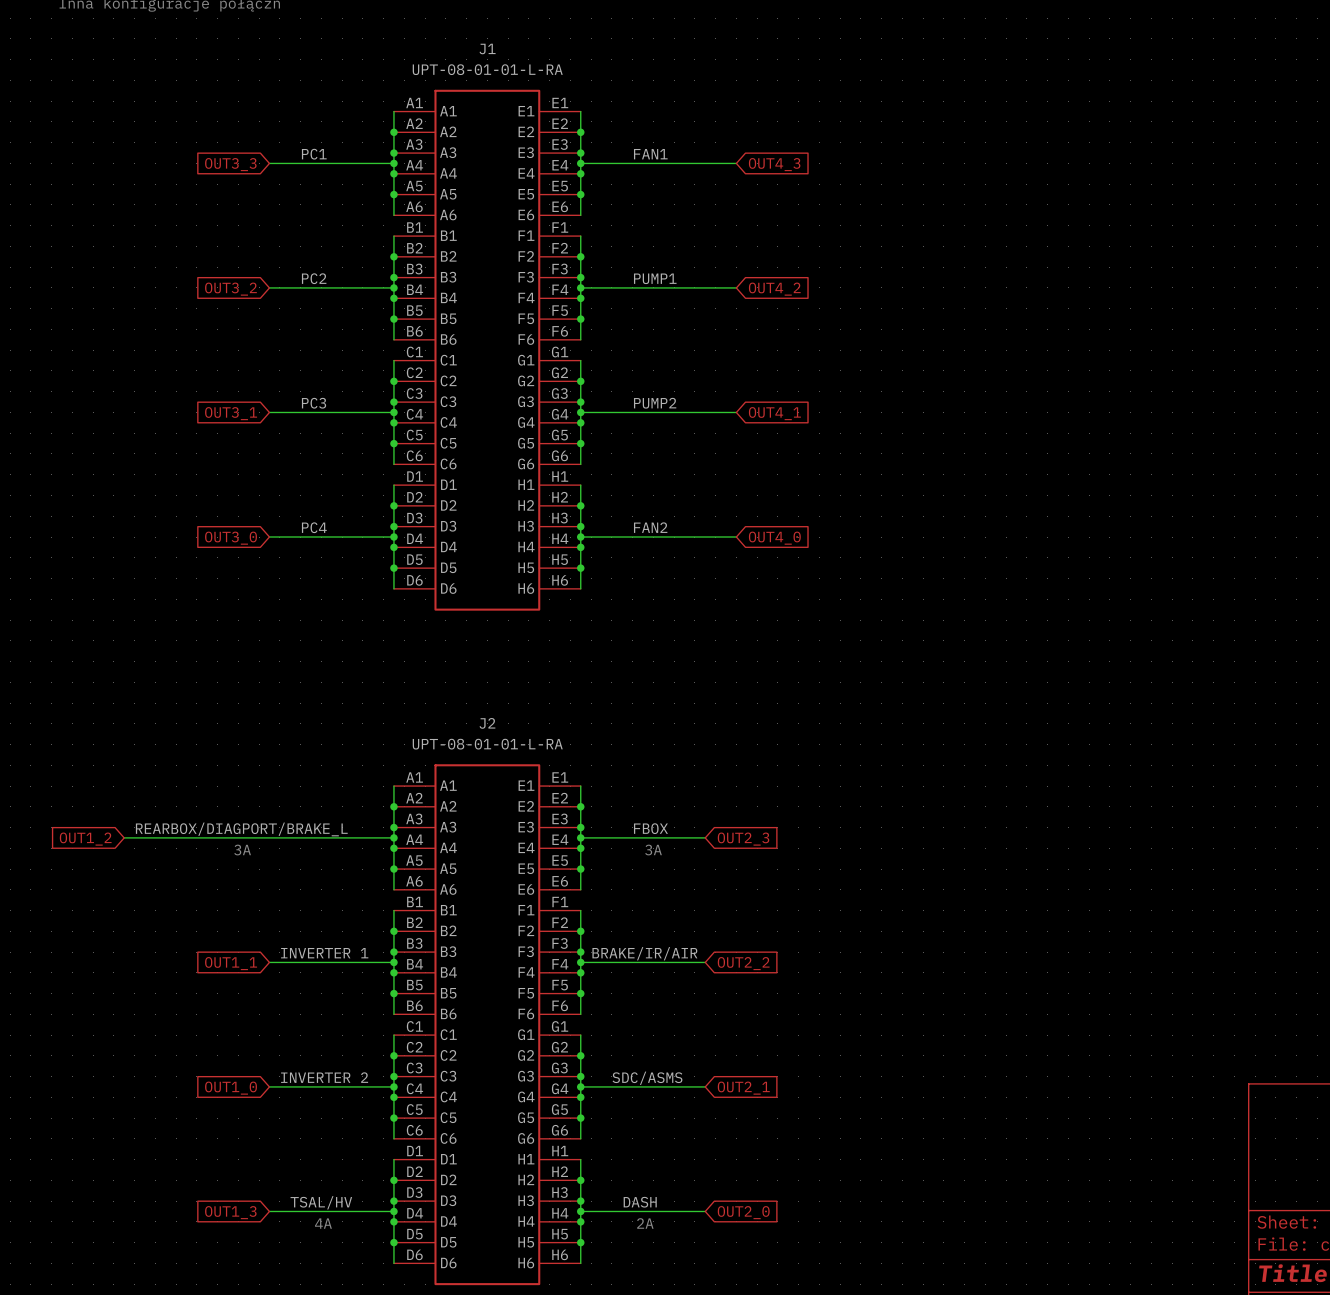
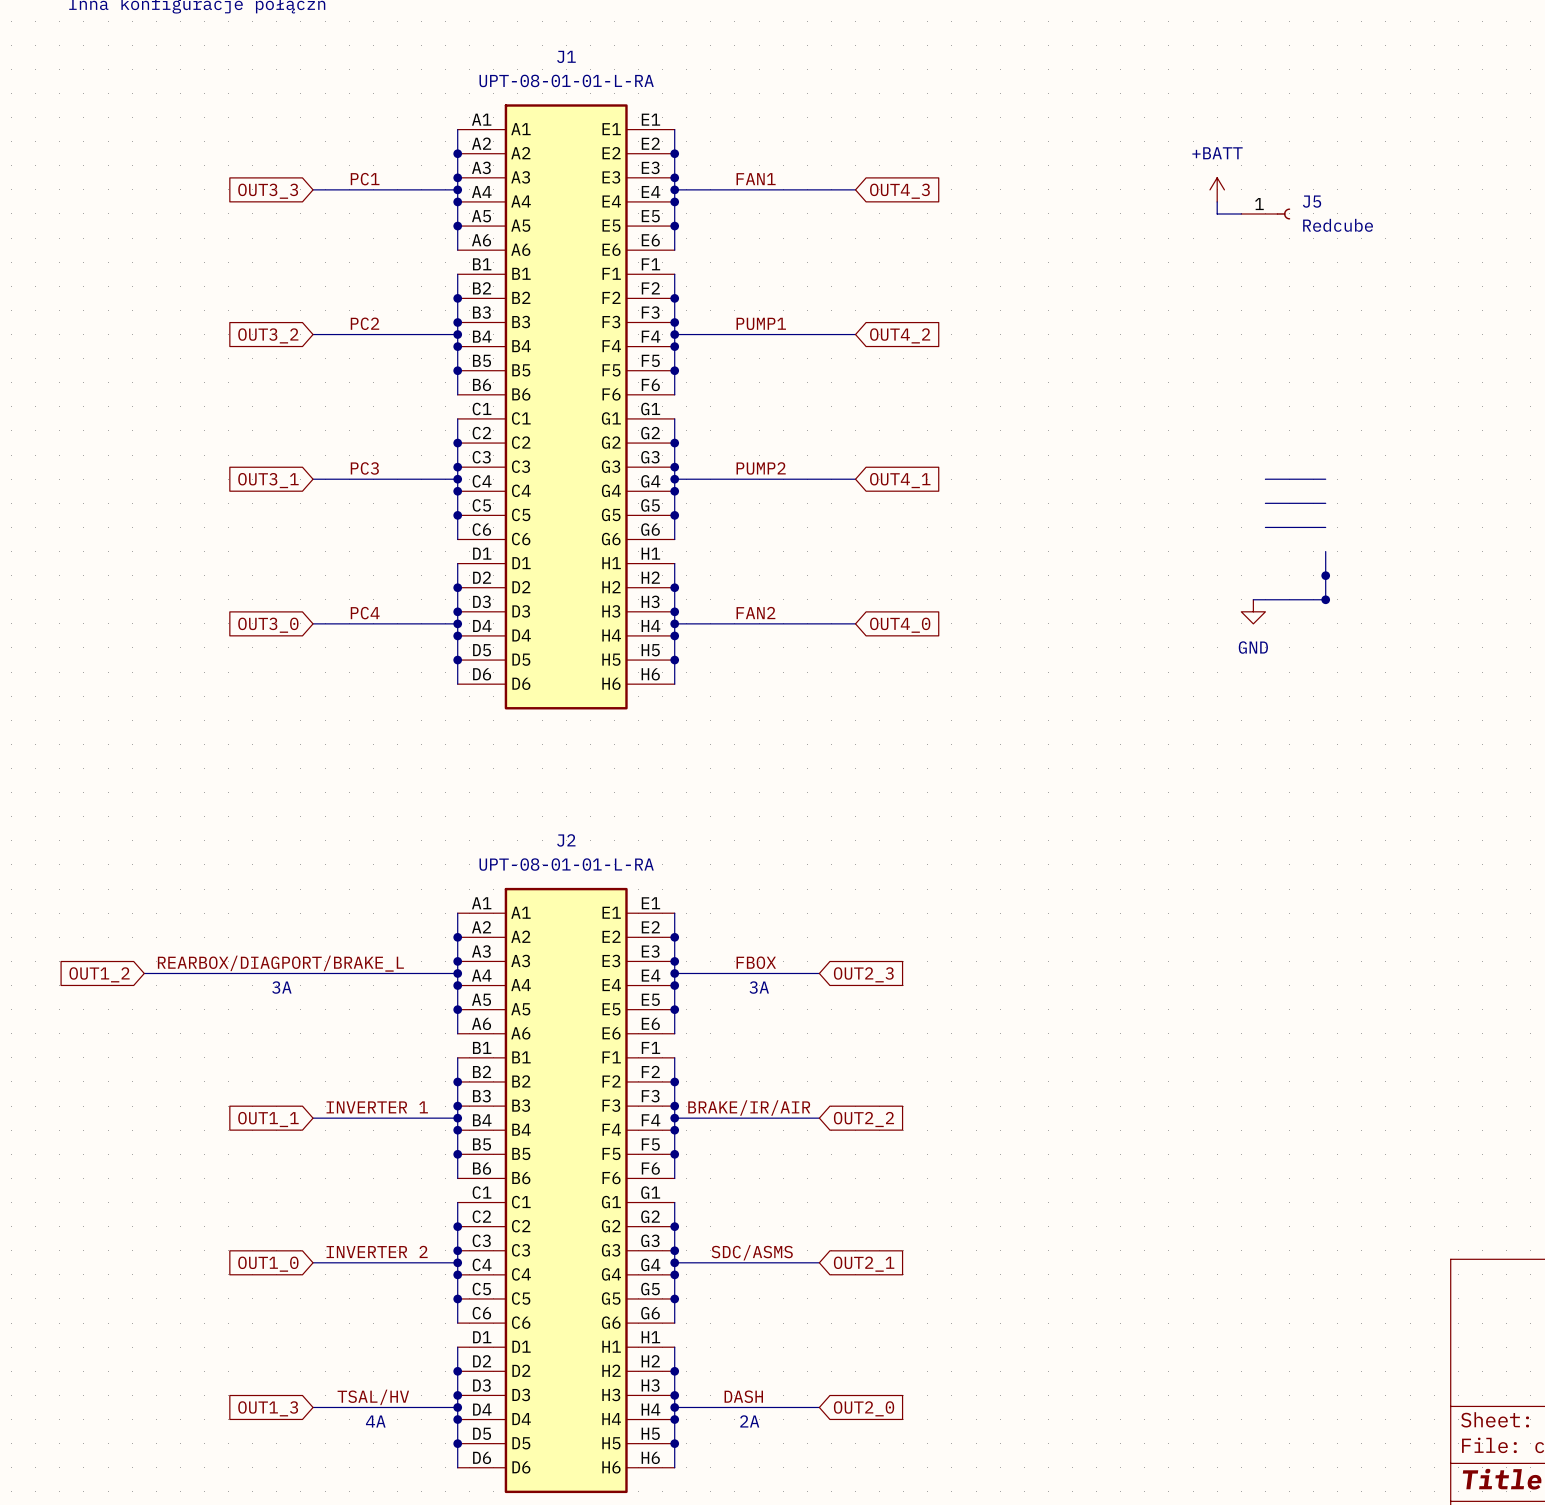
power symbol: none -> +BATT (1217, 189)
wire: none -> (1217, 201) (1217, 213) (1241, 213)
J5: none -> Redcube (1265, 213)
wire: none -> (1265, 479) (1325, 479)
wire: none -> (1265, 503) (1325, 503)
wire: none -> (1265, 527) (1325, 527)
wire: none -> (1325, 551) (1325, 599) (1253, 599)
junction: none -> (1325, 575)
junction: none -> (1325, 599)
power symbol: none -> GND (1253, 611)

